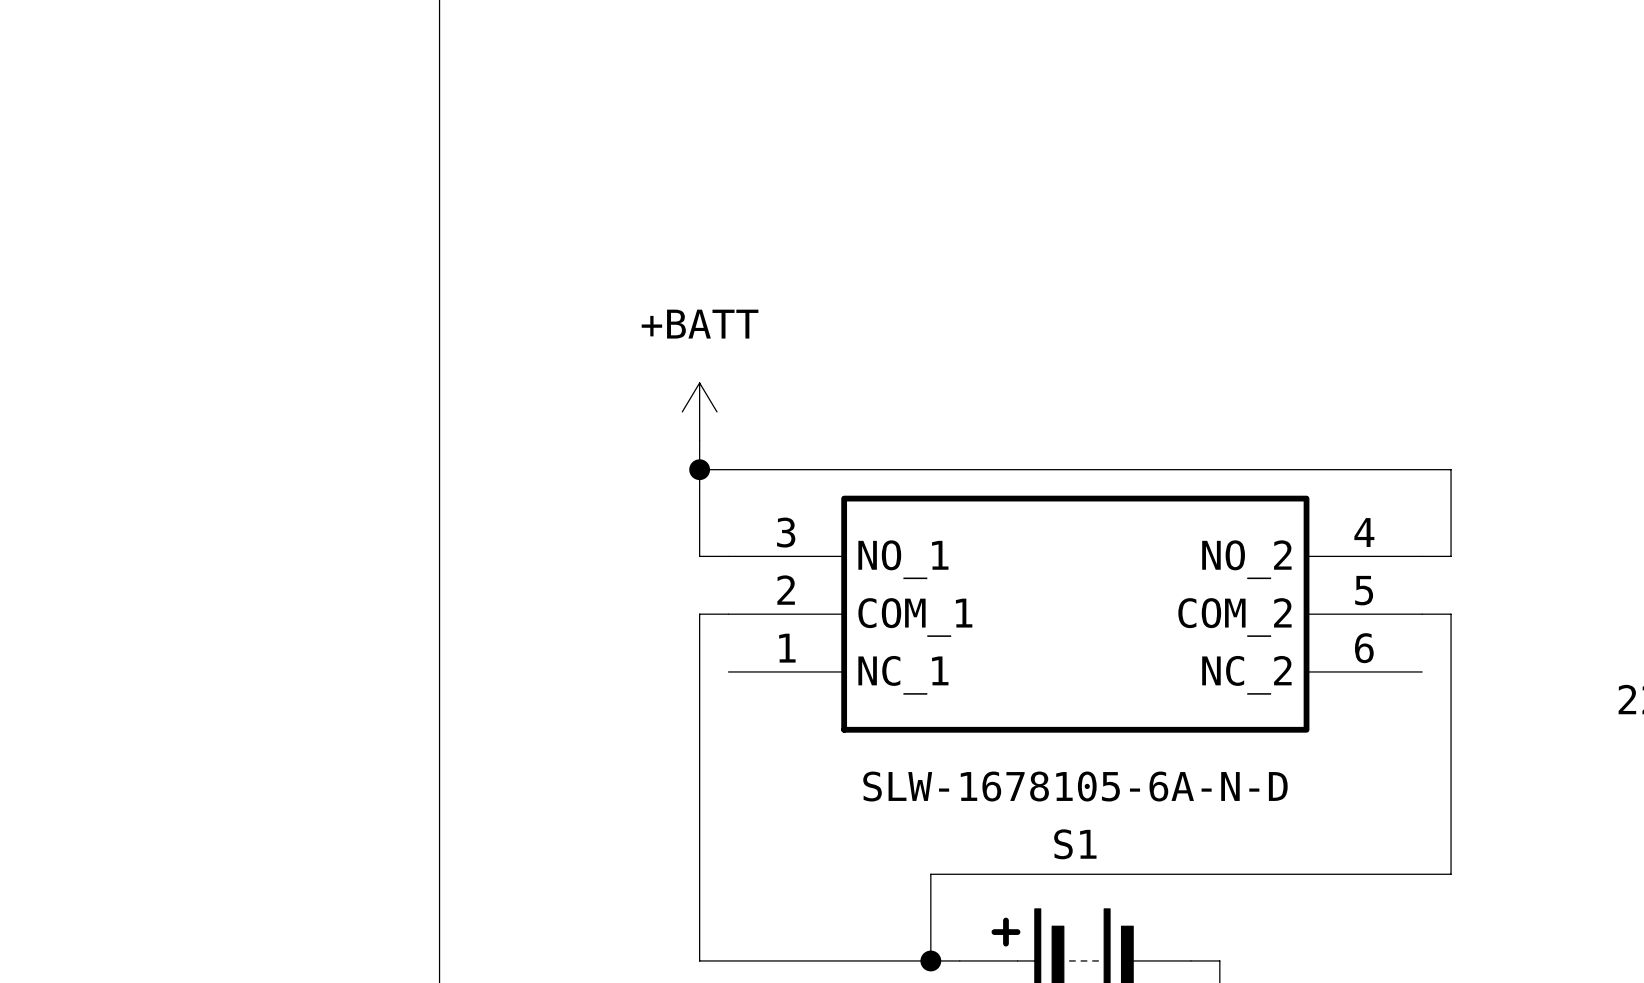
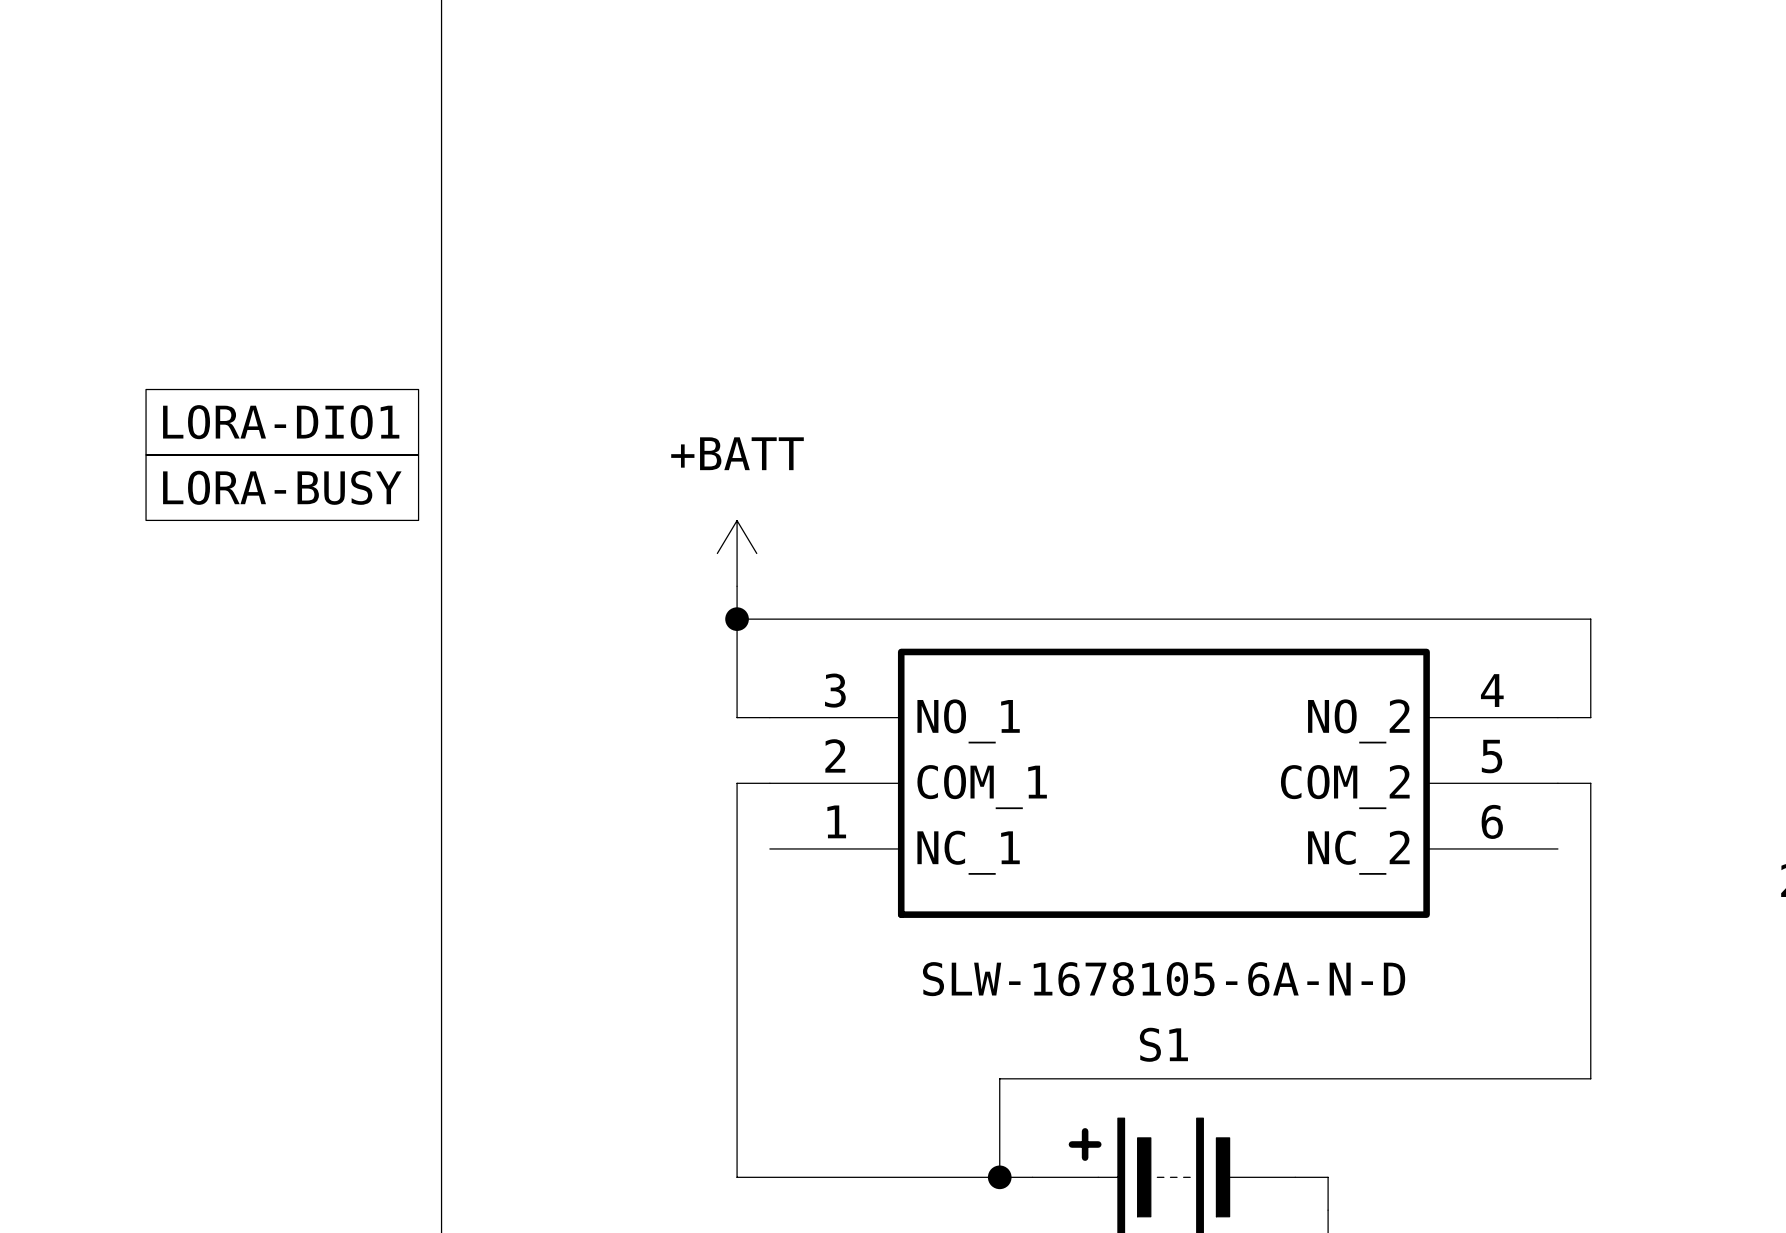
global label: none -> LORA-DIO1 (281, 422)
global label: none -> LORA-BUSY (282, 487)

